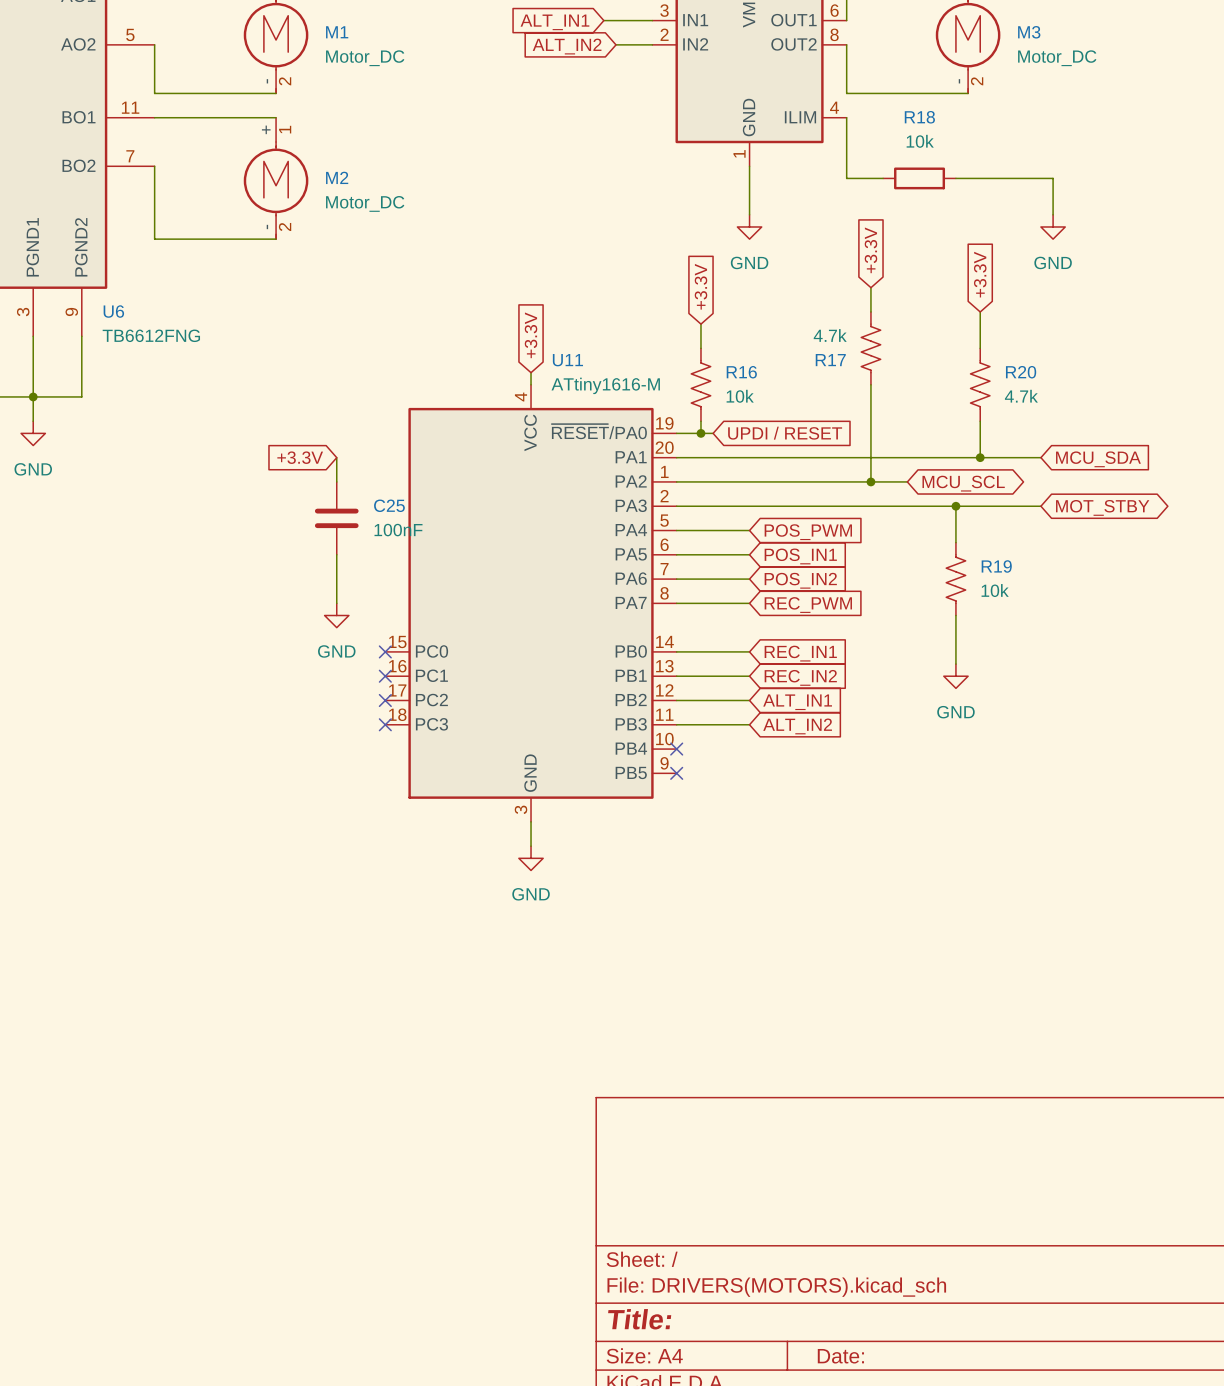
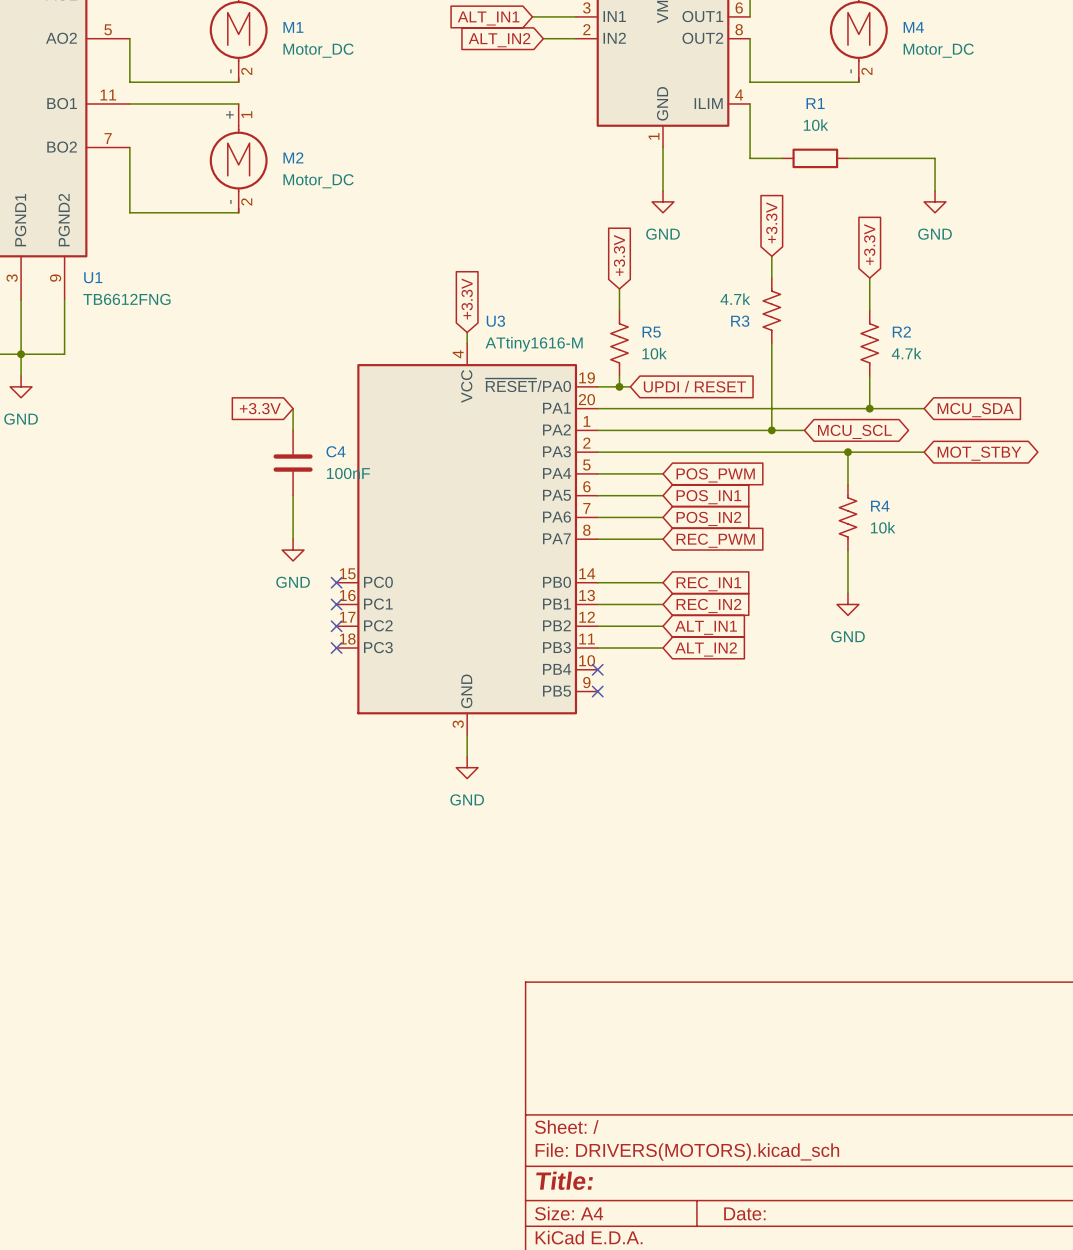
M3 name: M3 (1029, 32) -> M4 (913, 27)
R18 name: R18 (919, 117) -> R1 (815, 103)
U6 name: U6 (113, 311) -> U1 (93, 277)
U11 name: U11 (567, 360) -> U3 (495, 321)
R17 name: R17 (830, 360) -> R3 (740, 321)
R16 name: R16 (741, 372) -> R5 (651, 332)
R20 name: R20 (1021, 372) -> R2 (901, 331)
C25 name: C25 (389, 505) -> C4 (336, 451)
R19 name: R19 (996, 566) -> R4 (880, 506)

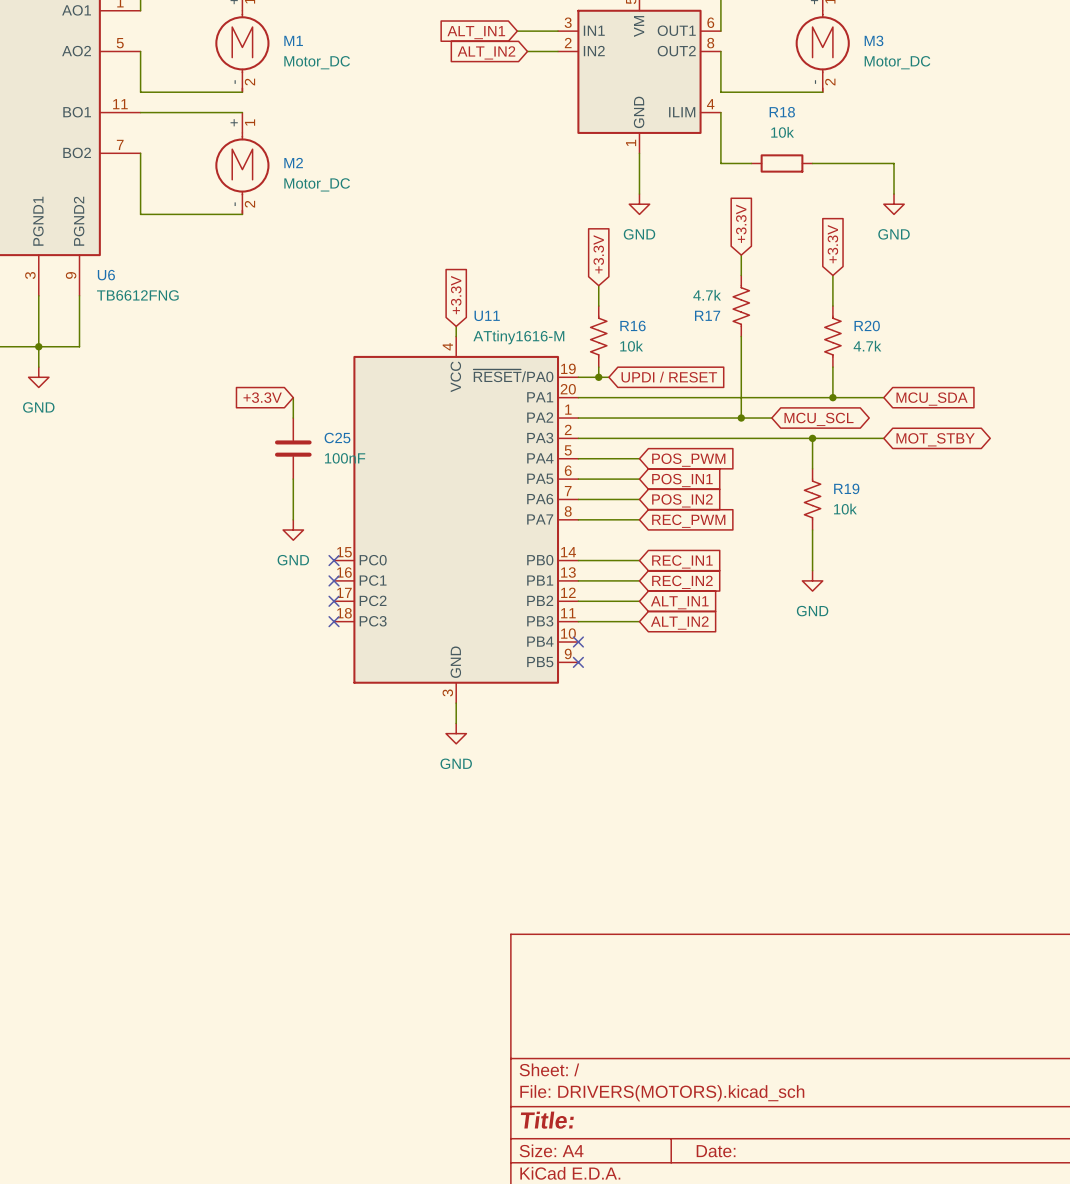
M4 name: M4 (913, 27) -> M3 (874, 40)
R1 name: R1 (815, 103) -> R18 (782, 112)
U1 name: U1 (93, 277) -> U6 (106, 275)
U3 name: U3 (495, 321) -> U11 (487, 315)
R3 name: R3 (740, 321) -> R17 (707, 315)
R2 name: R2 (901, 331) -> R20 (867, 326)
R5 name: R5 (651, 332) -> R16 (632, 326)
C4 name: C4 (336, 451) -> C25 (337, 437)
R4 name: R4 (880, 506) -> R19 (846, 488)

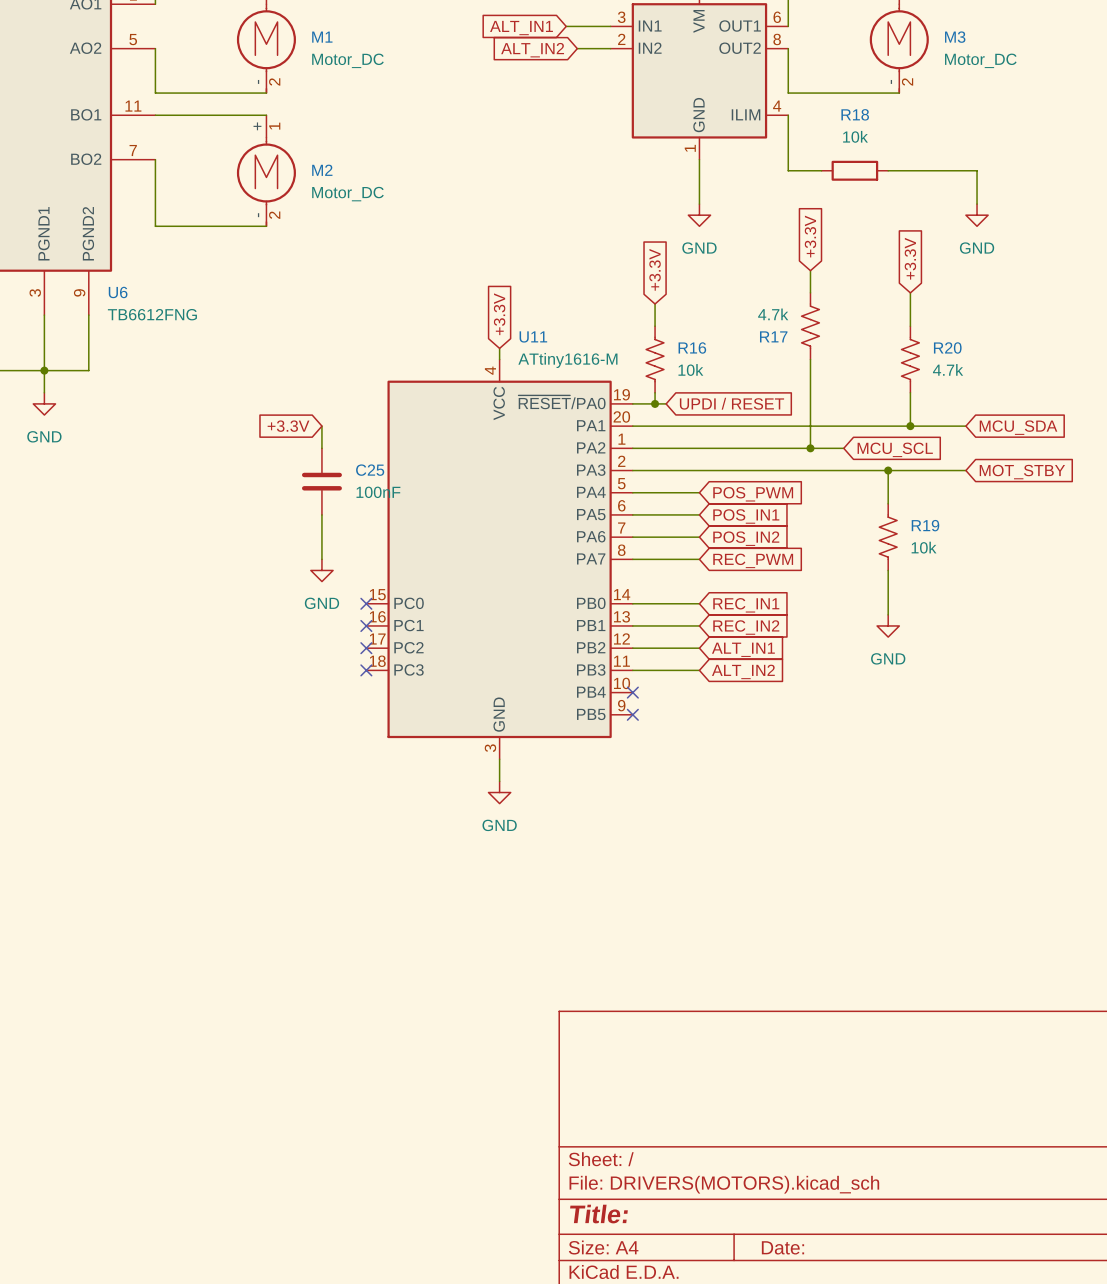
global label shape: bidirectional (819, 419) -> input (895, 449)
global label shape: bidirectional (935, 439) -> input (1022, 472)

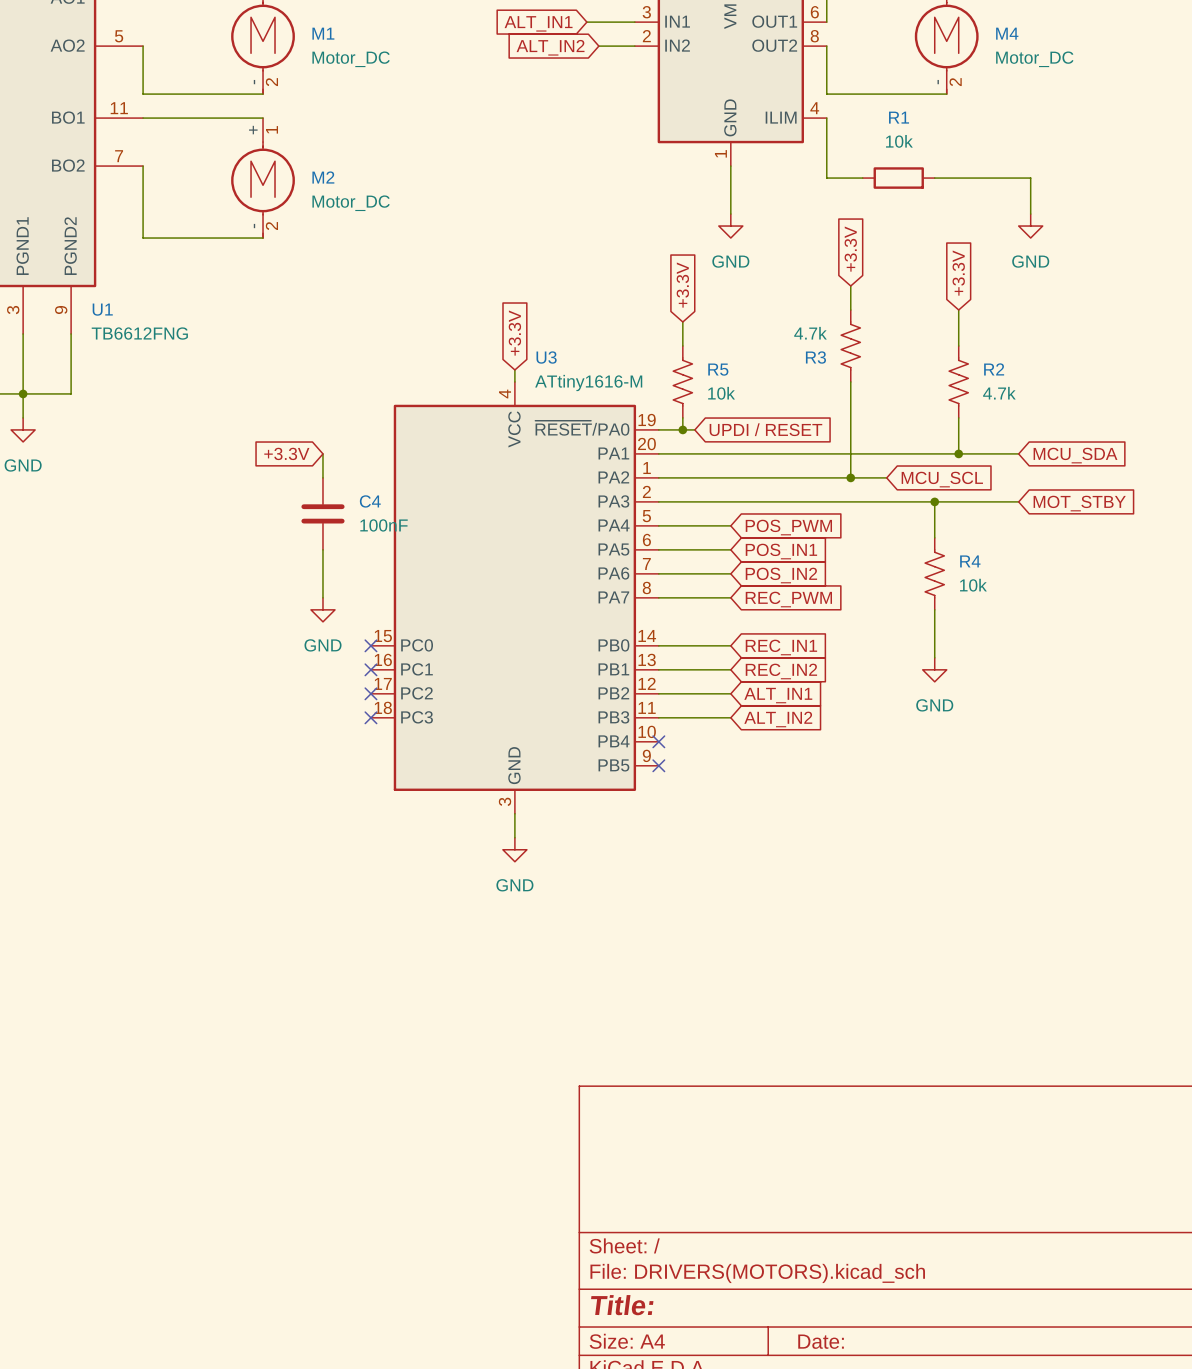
M3 name: M3 (955, 37) -> M4 (1007, 33)
R18 name: R18 (855, 114) -> R1 (899, 117)
U6 name: U6 (118, 292) -> U1 (102, 309)
U11 name: U11 (533, 336) -> U3 (546, 357)
R17 name: R17 (773, 336) -> R3 (815, 357)
R16 name: R16 (692, 347) -> R5 (718, 369)
R20 name: R20 (947, 347) -> R2 (994, 369)
C25 name: C25 (370, 470) -> C4 (370, 501)
R19 name: R19 (925, 525) -> R4 (970, 561)

